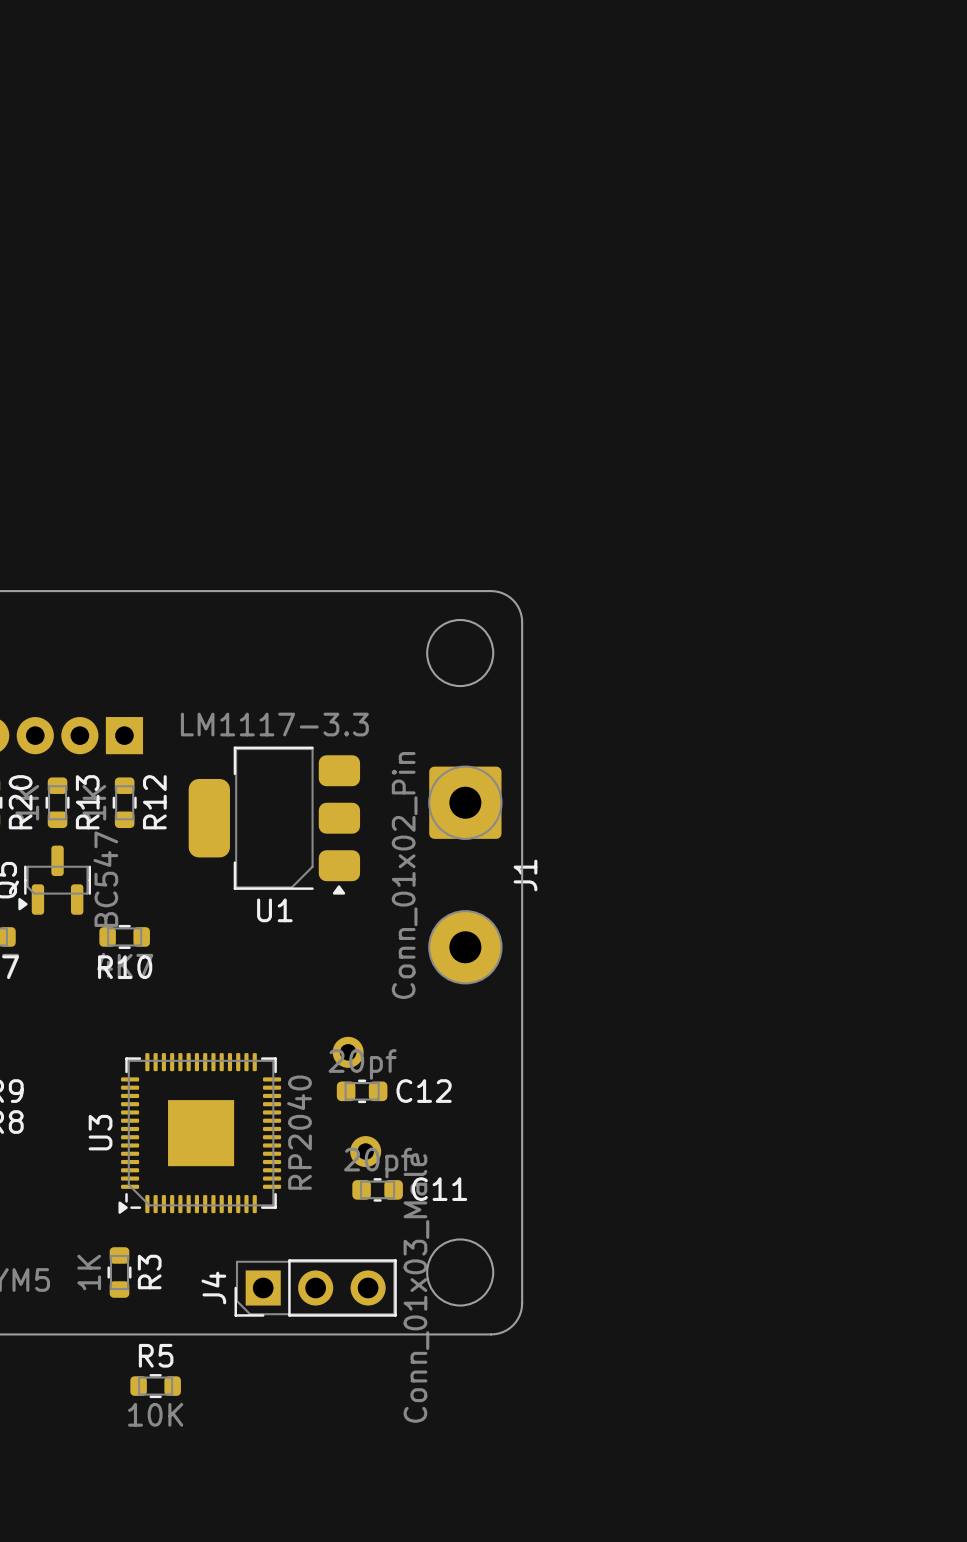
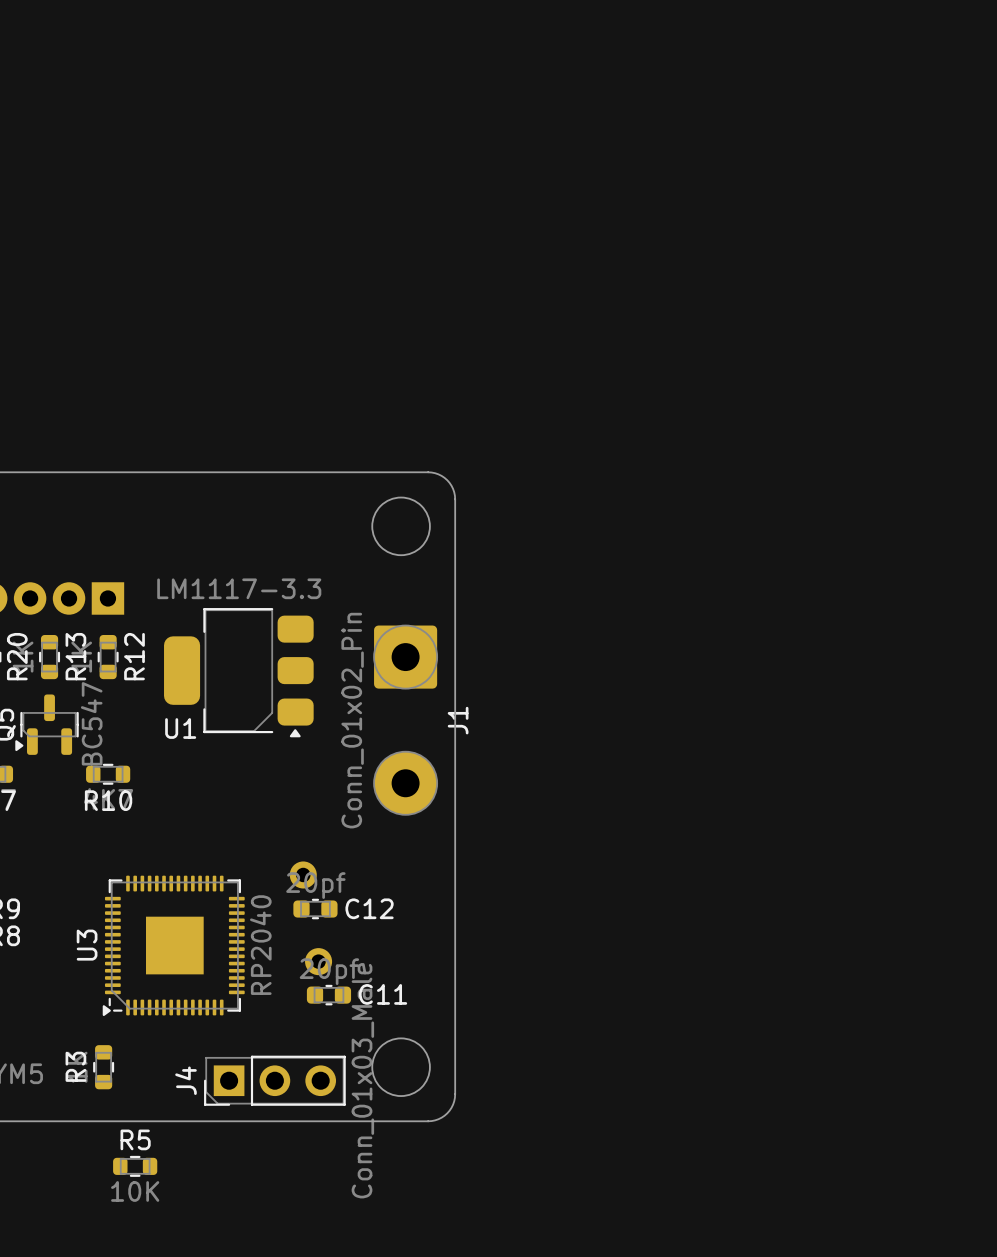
U1 name position: U1 (274, 910) -> U1 (180, 728)
R3 name position: R3 (149, 1272) -> R3 (75, 1066)

